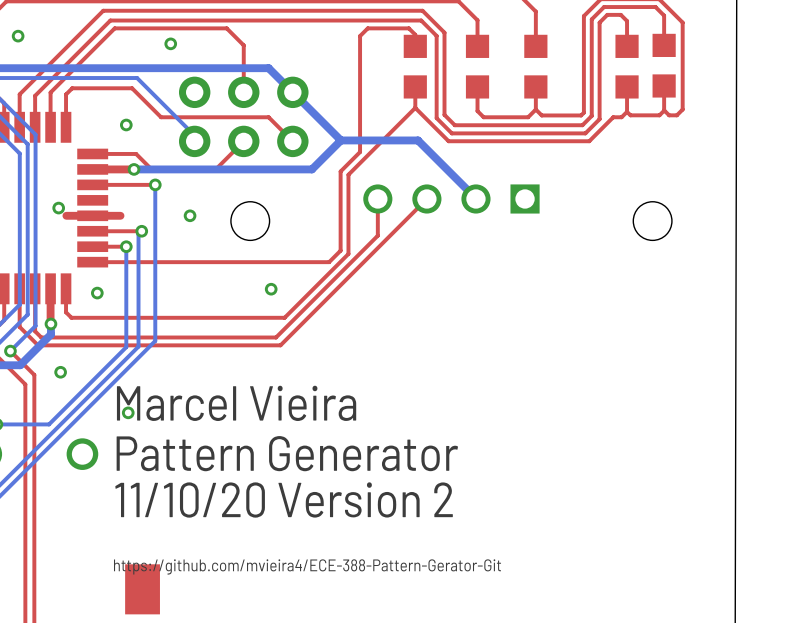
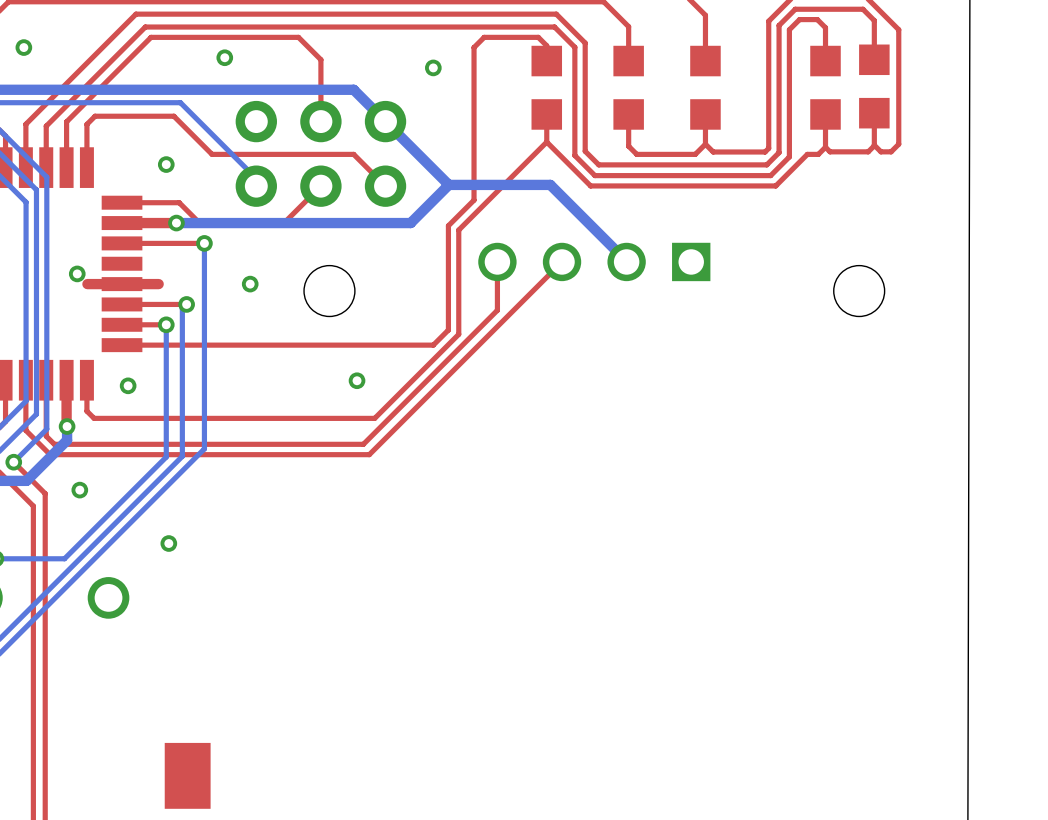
via: none -> (433, 67)
text: Marcel Vieira (236, 403) -> none
text: Pattern Generator (287, 453) -> none
text: 11/10/20 Version 2 (284, 499) -> none
text: https://github.com/mvieira4/ECE-388-Pattern-Gerator-Git (307, 566) -> none

